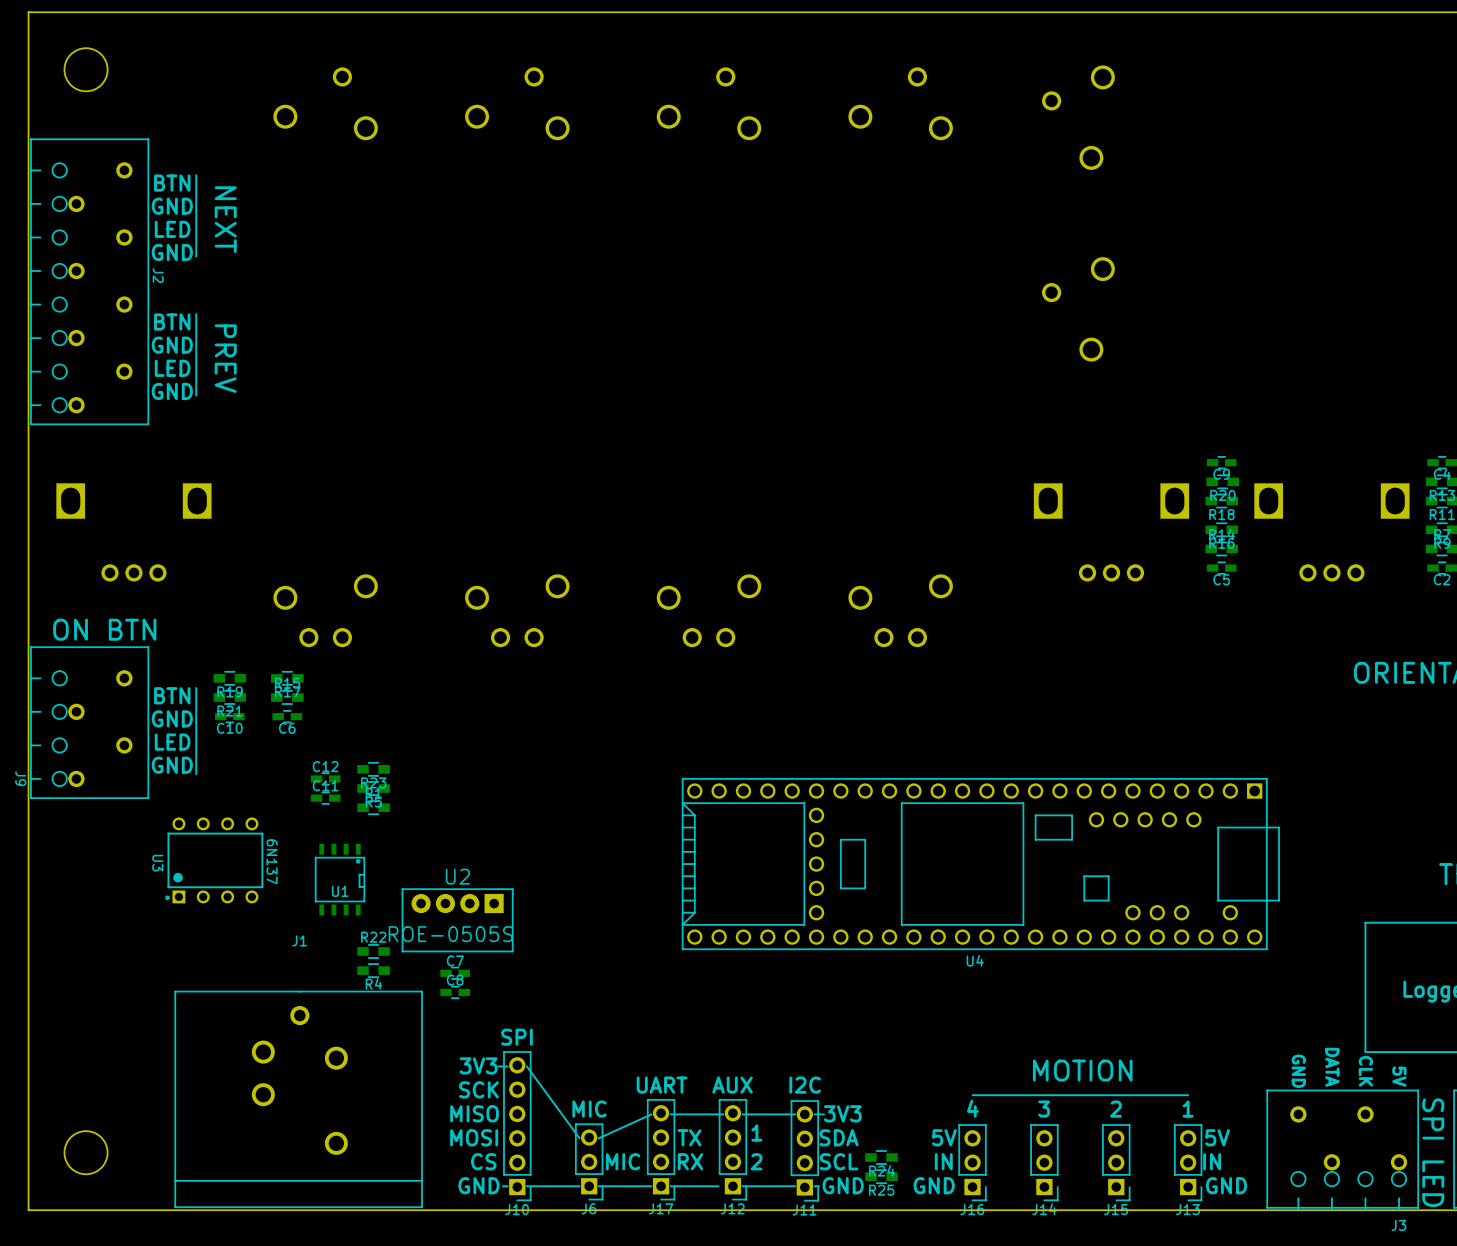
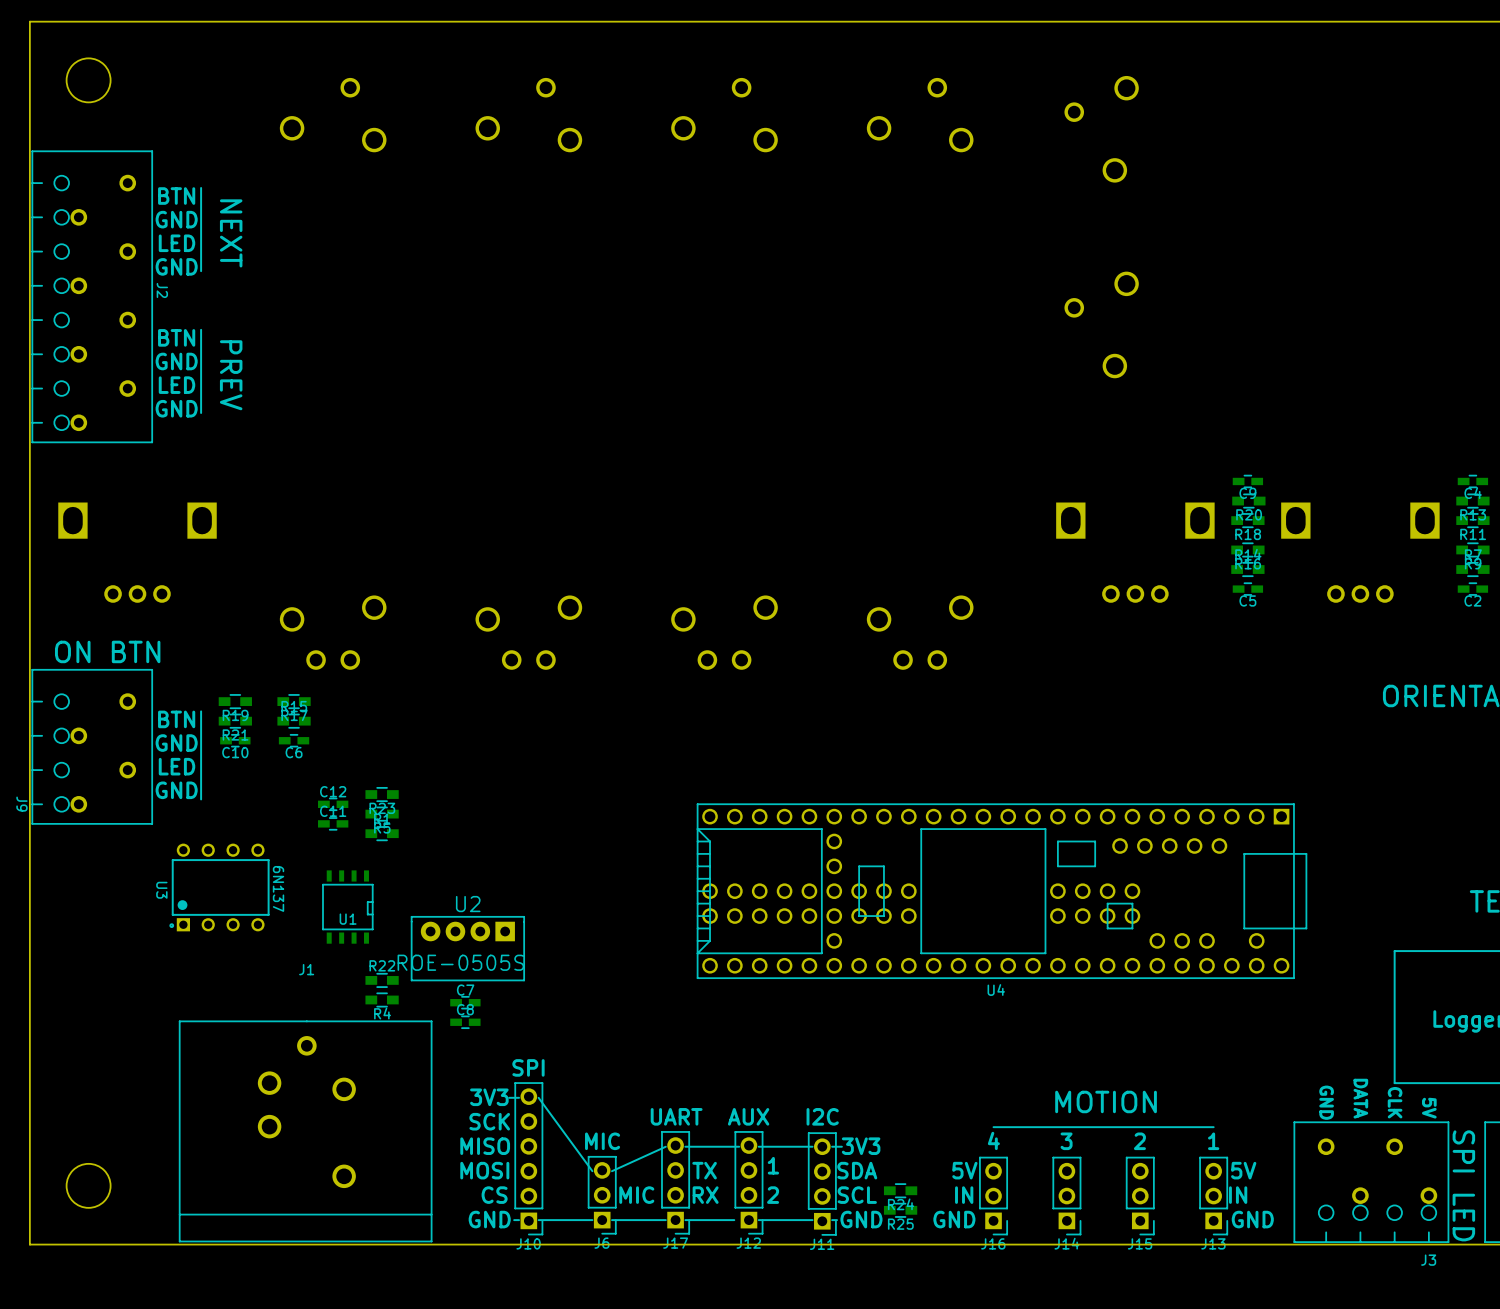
U4 footprint: [681, 778, 1280, 950] -> [696, 803, 1308, 979]
drawing: [355, 859, 361, 864] -> none

